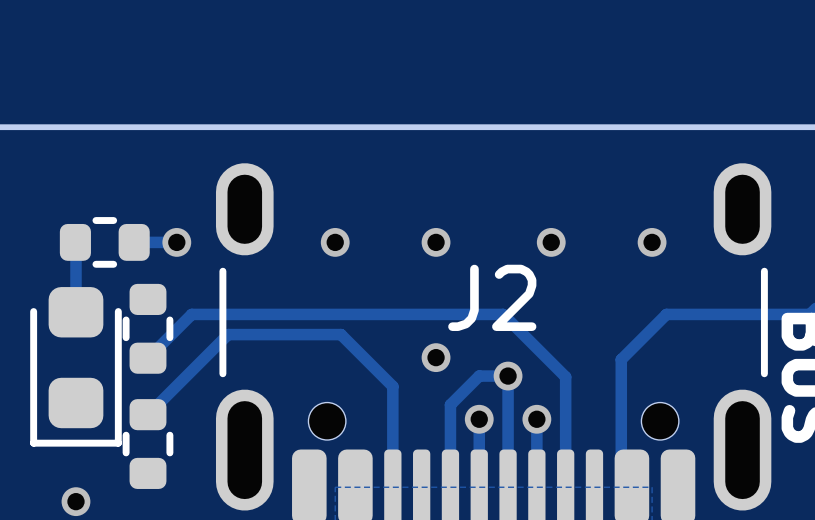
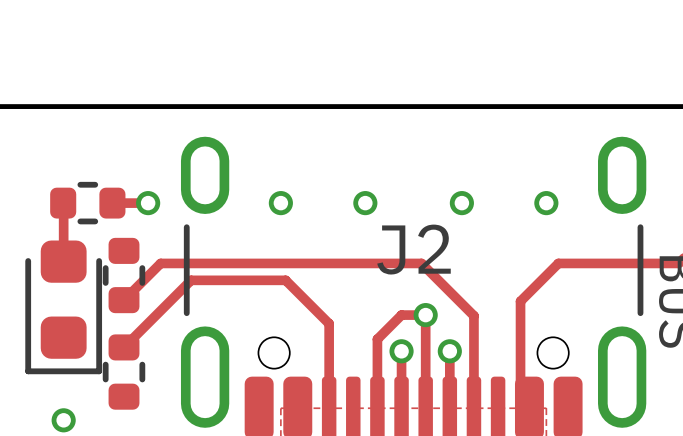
via: (436, 357) -> none

